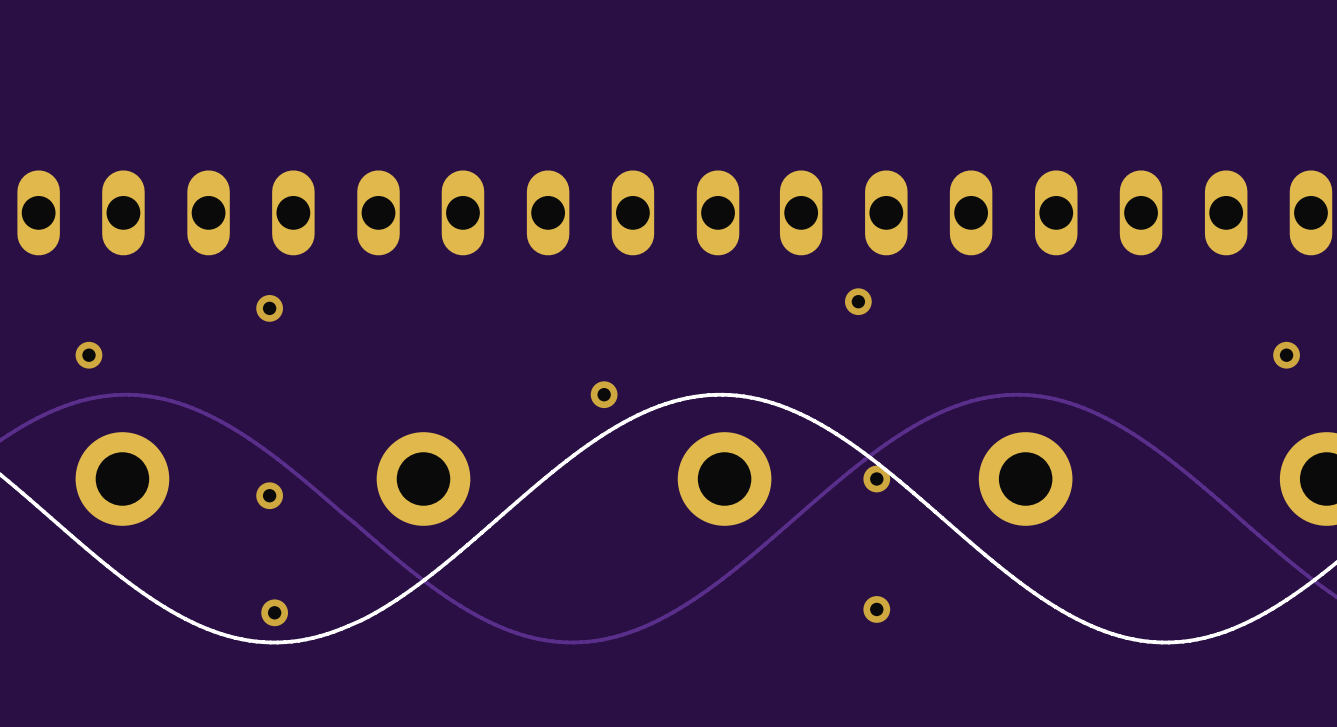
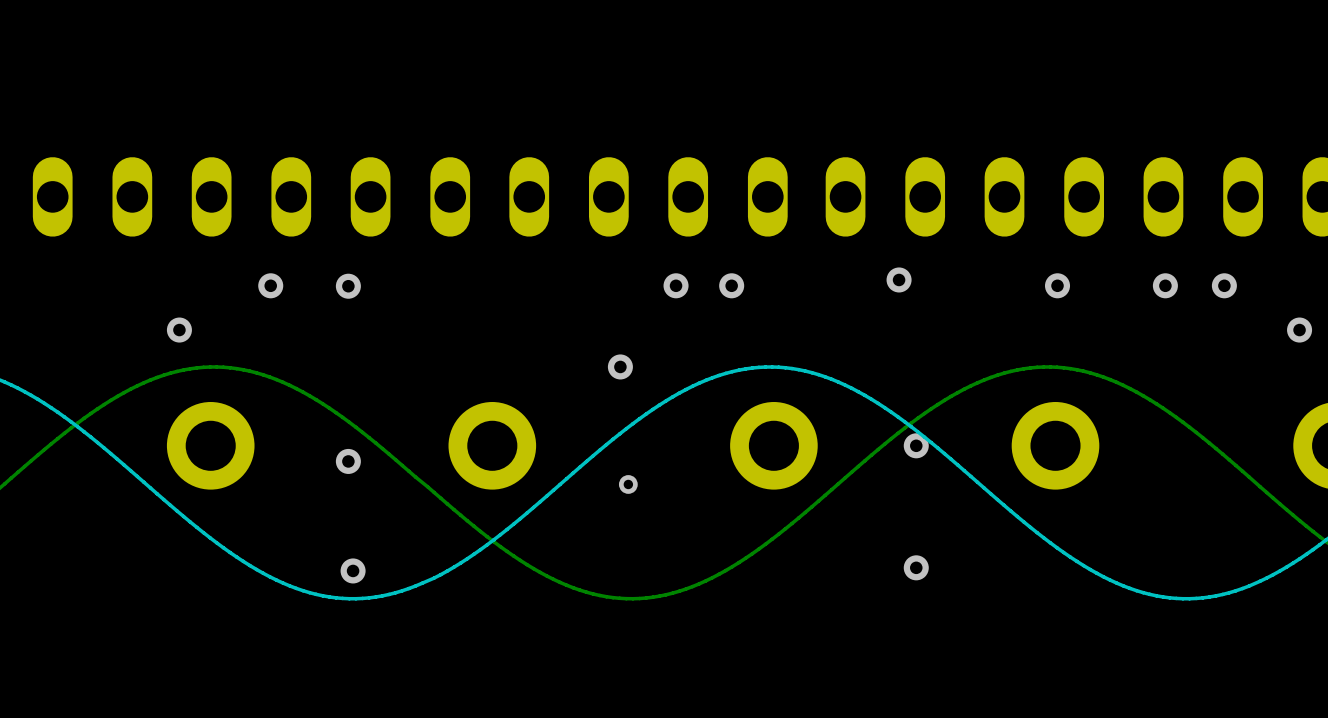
via: none -> (270, 285)
via: none -> (676, 285)
via: none -> (731, 285)
via: none -> (1057, 285)
via: none -> (1165, 285)
via: none -> (1224, 285)
via position: (604, 394) -> (620, 366)
via: none -> (628, 484)

